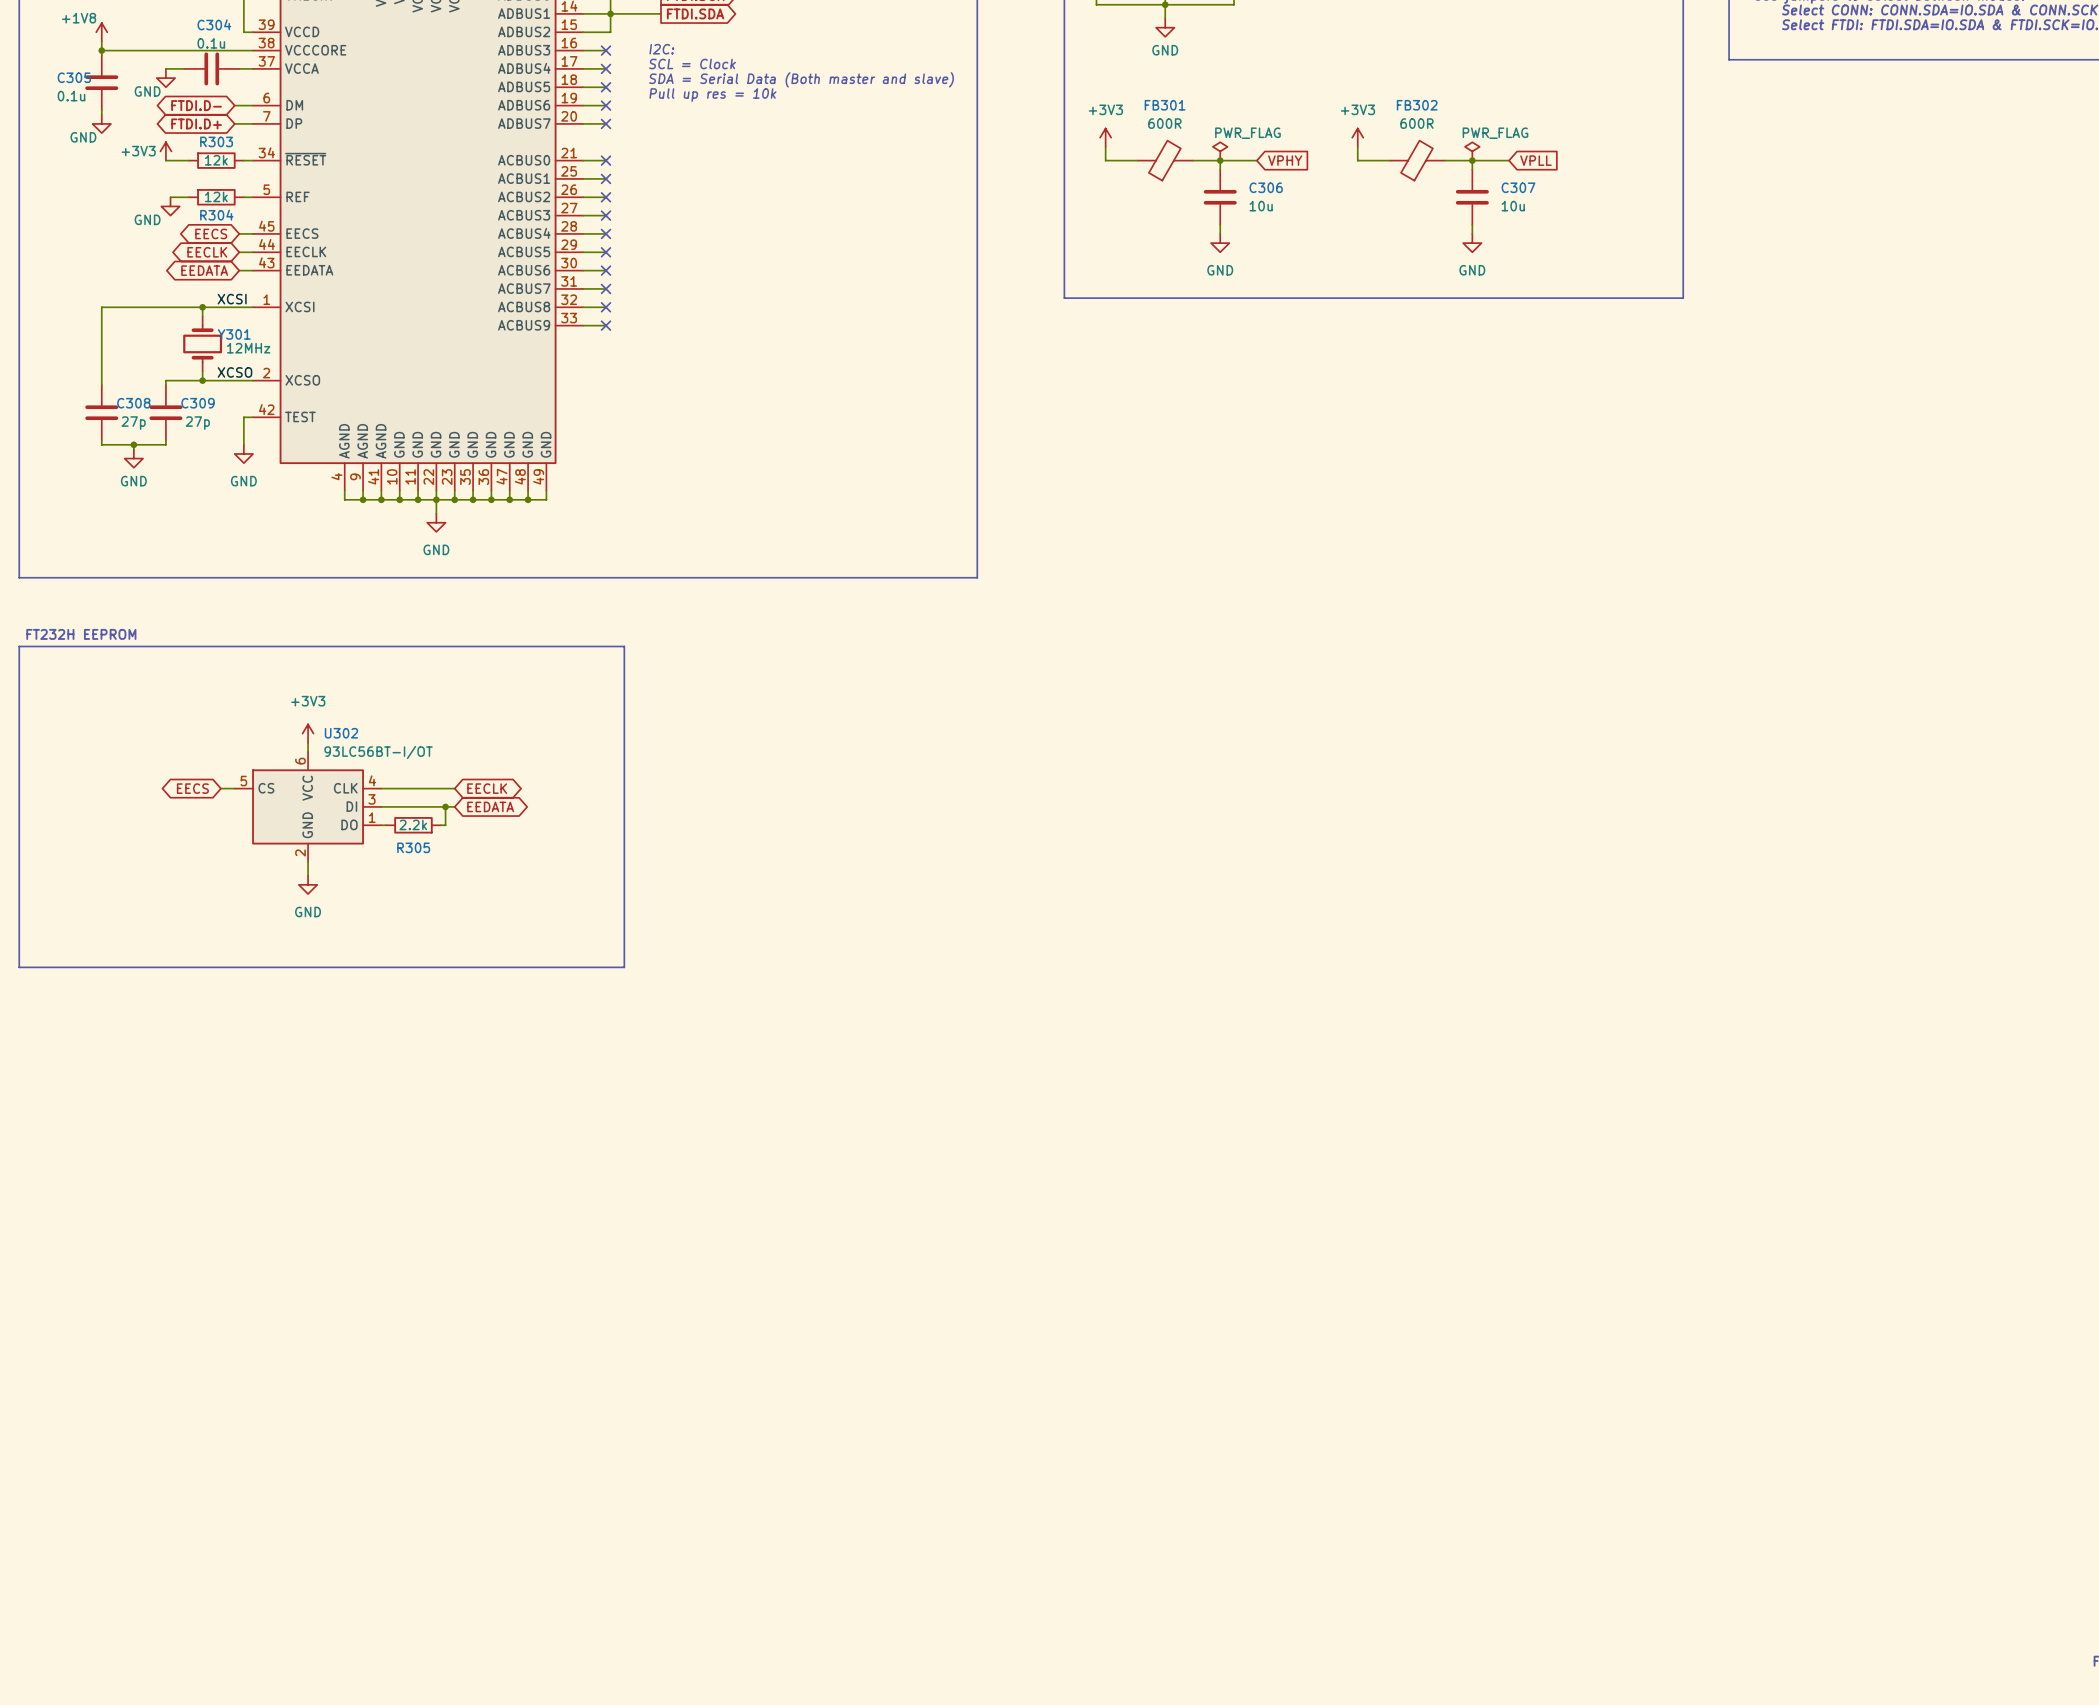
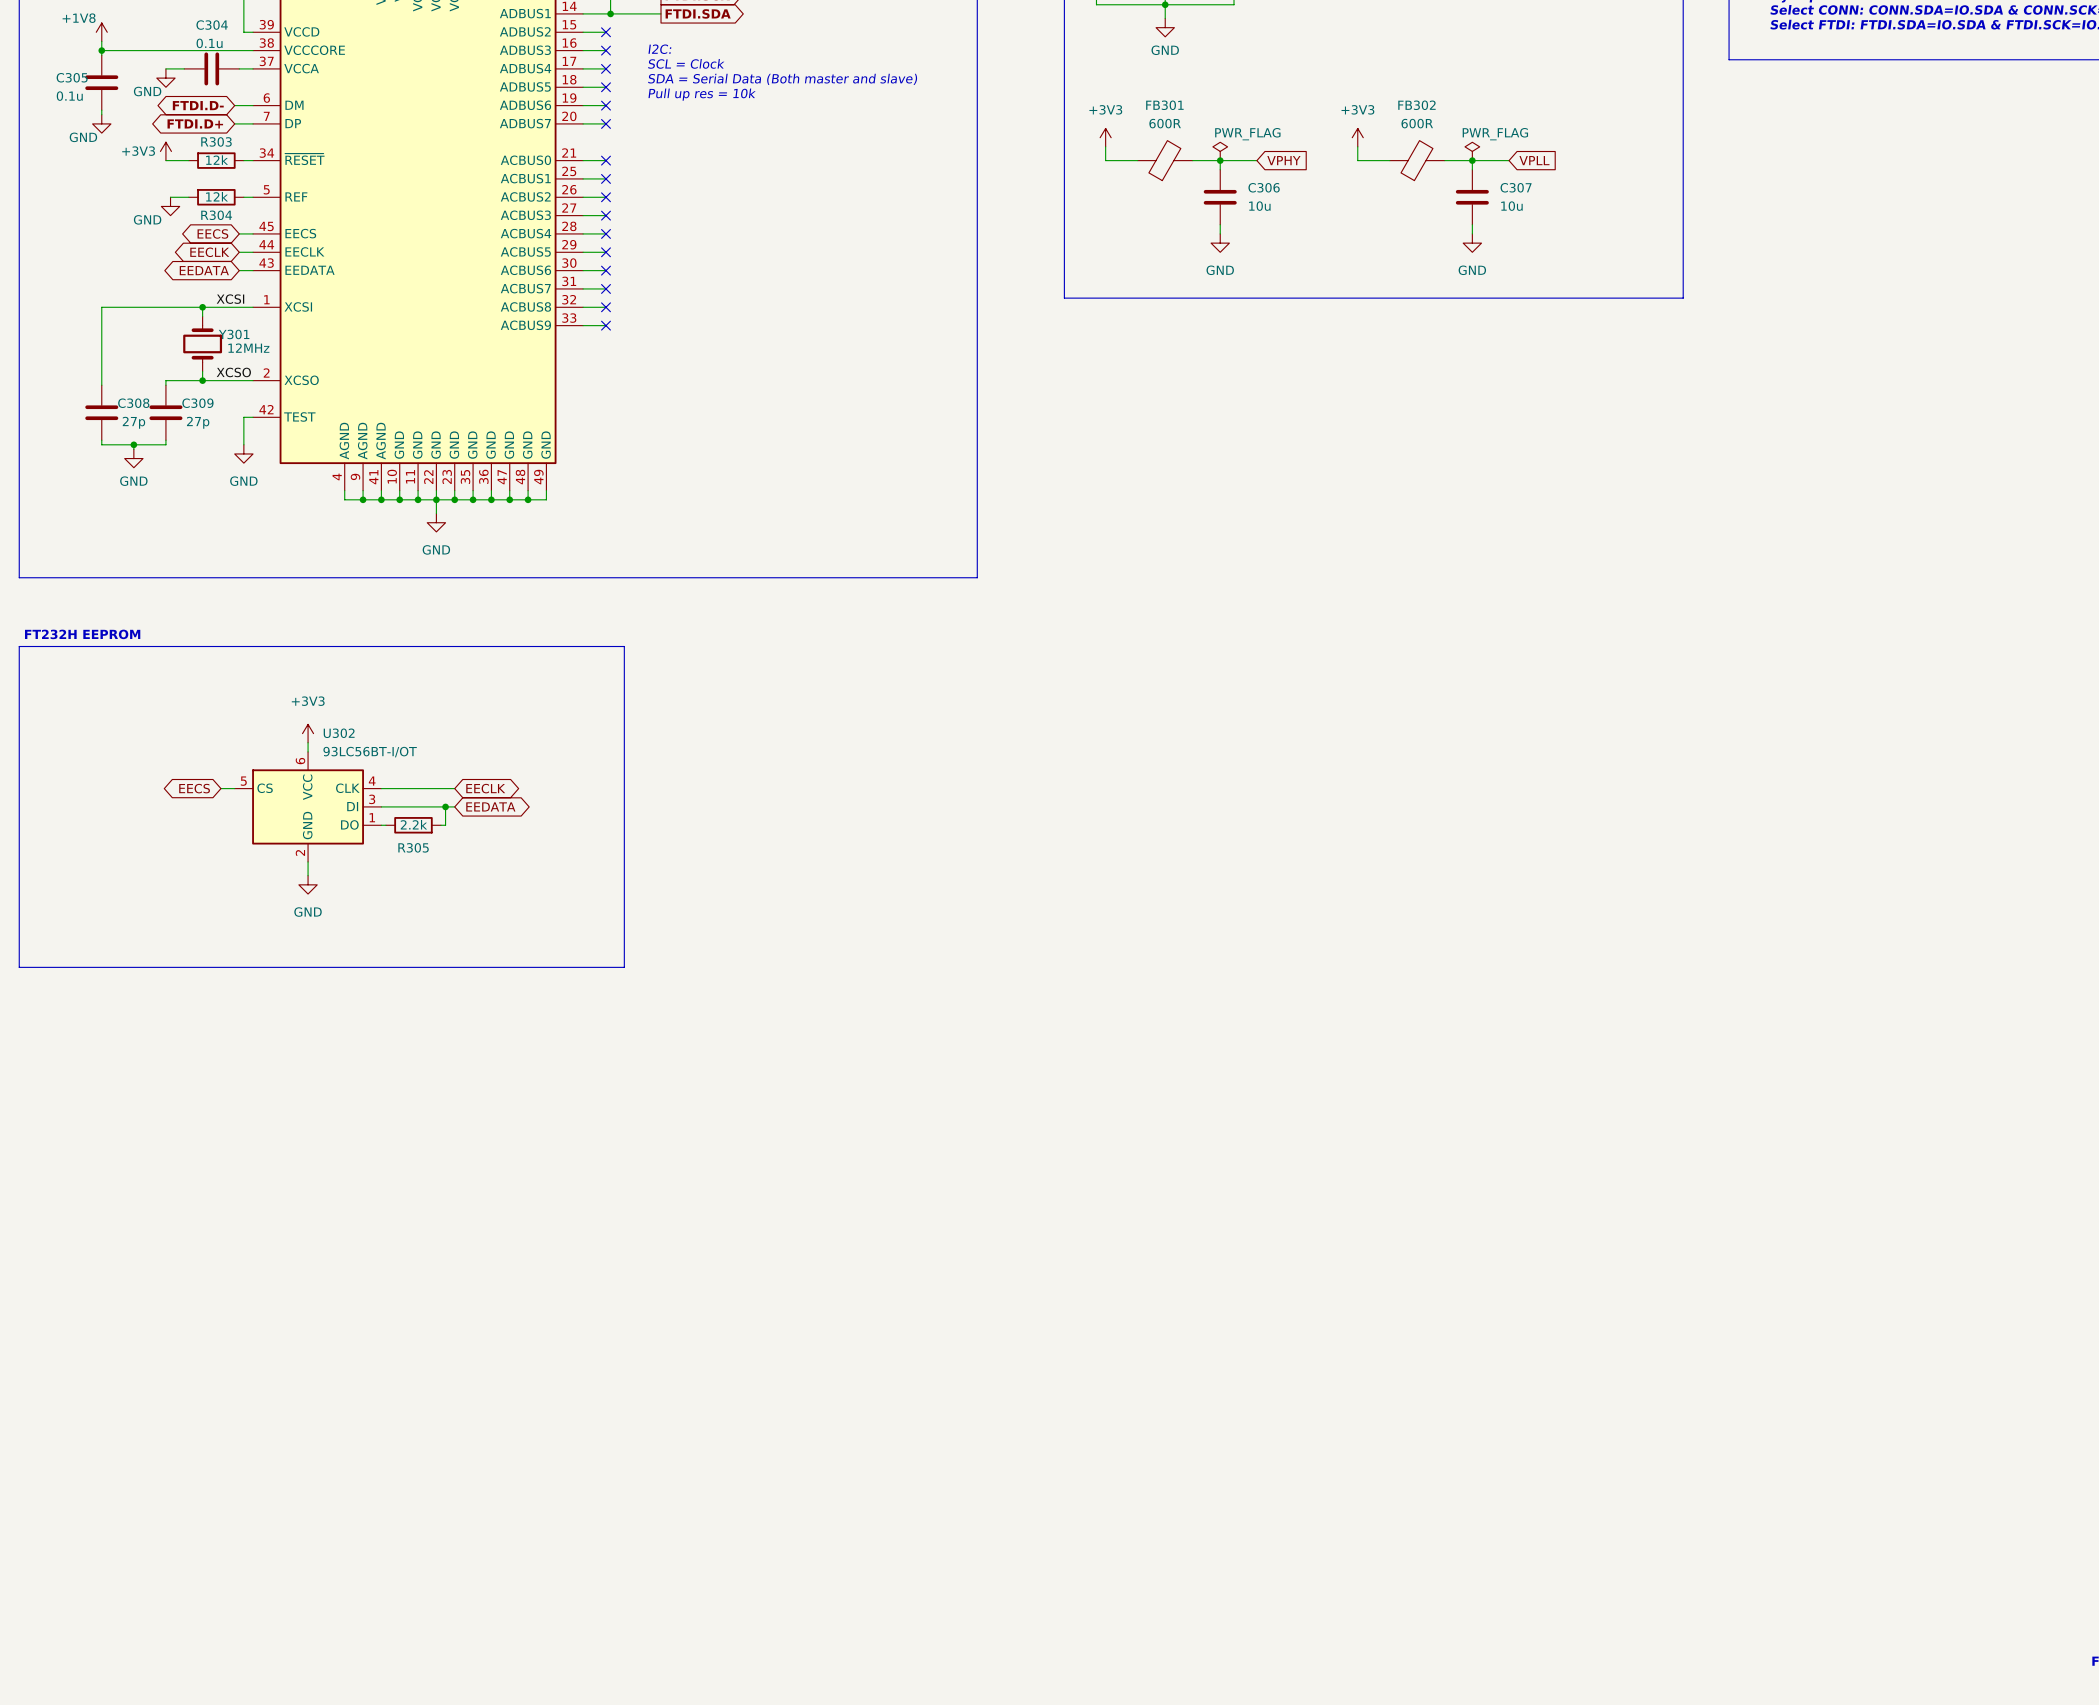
wire: (610, 13) (610, 32) (606, 32) -> none
no-connect mark: none -> (606, 32)

